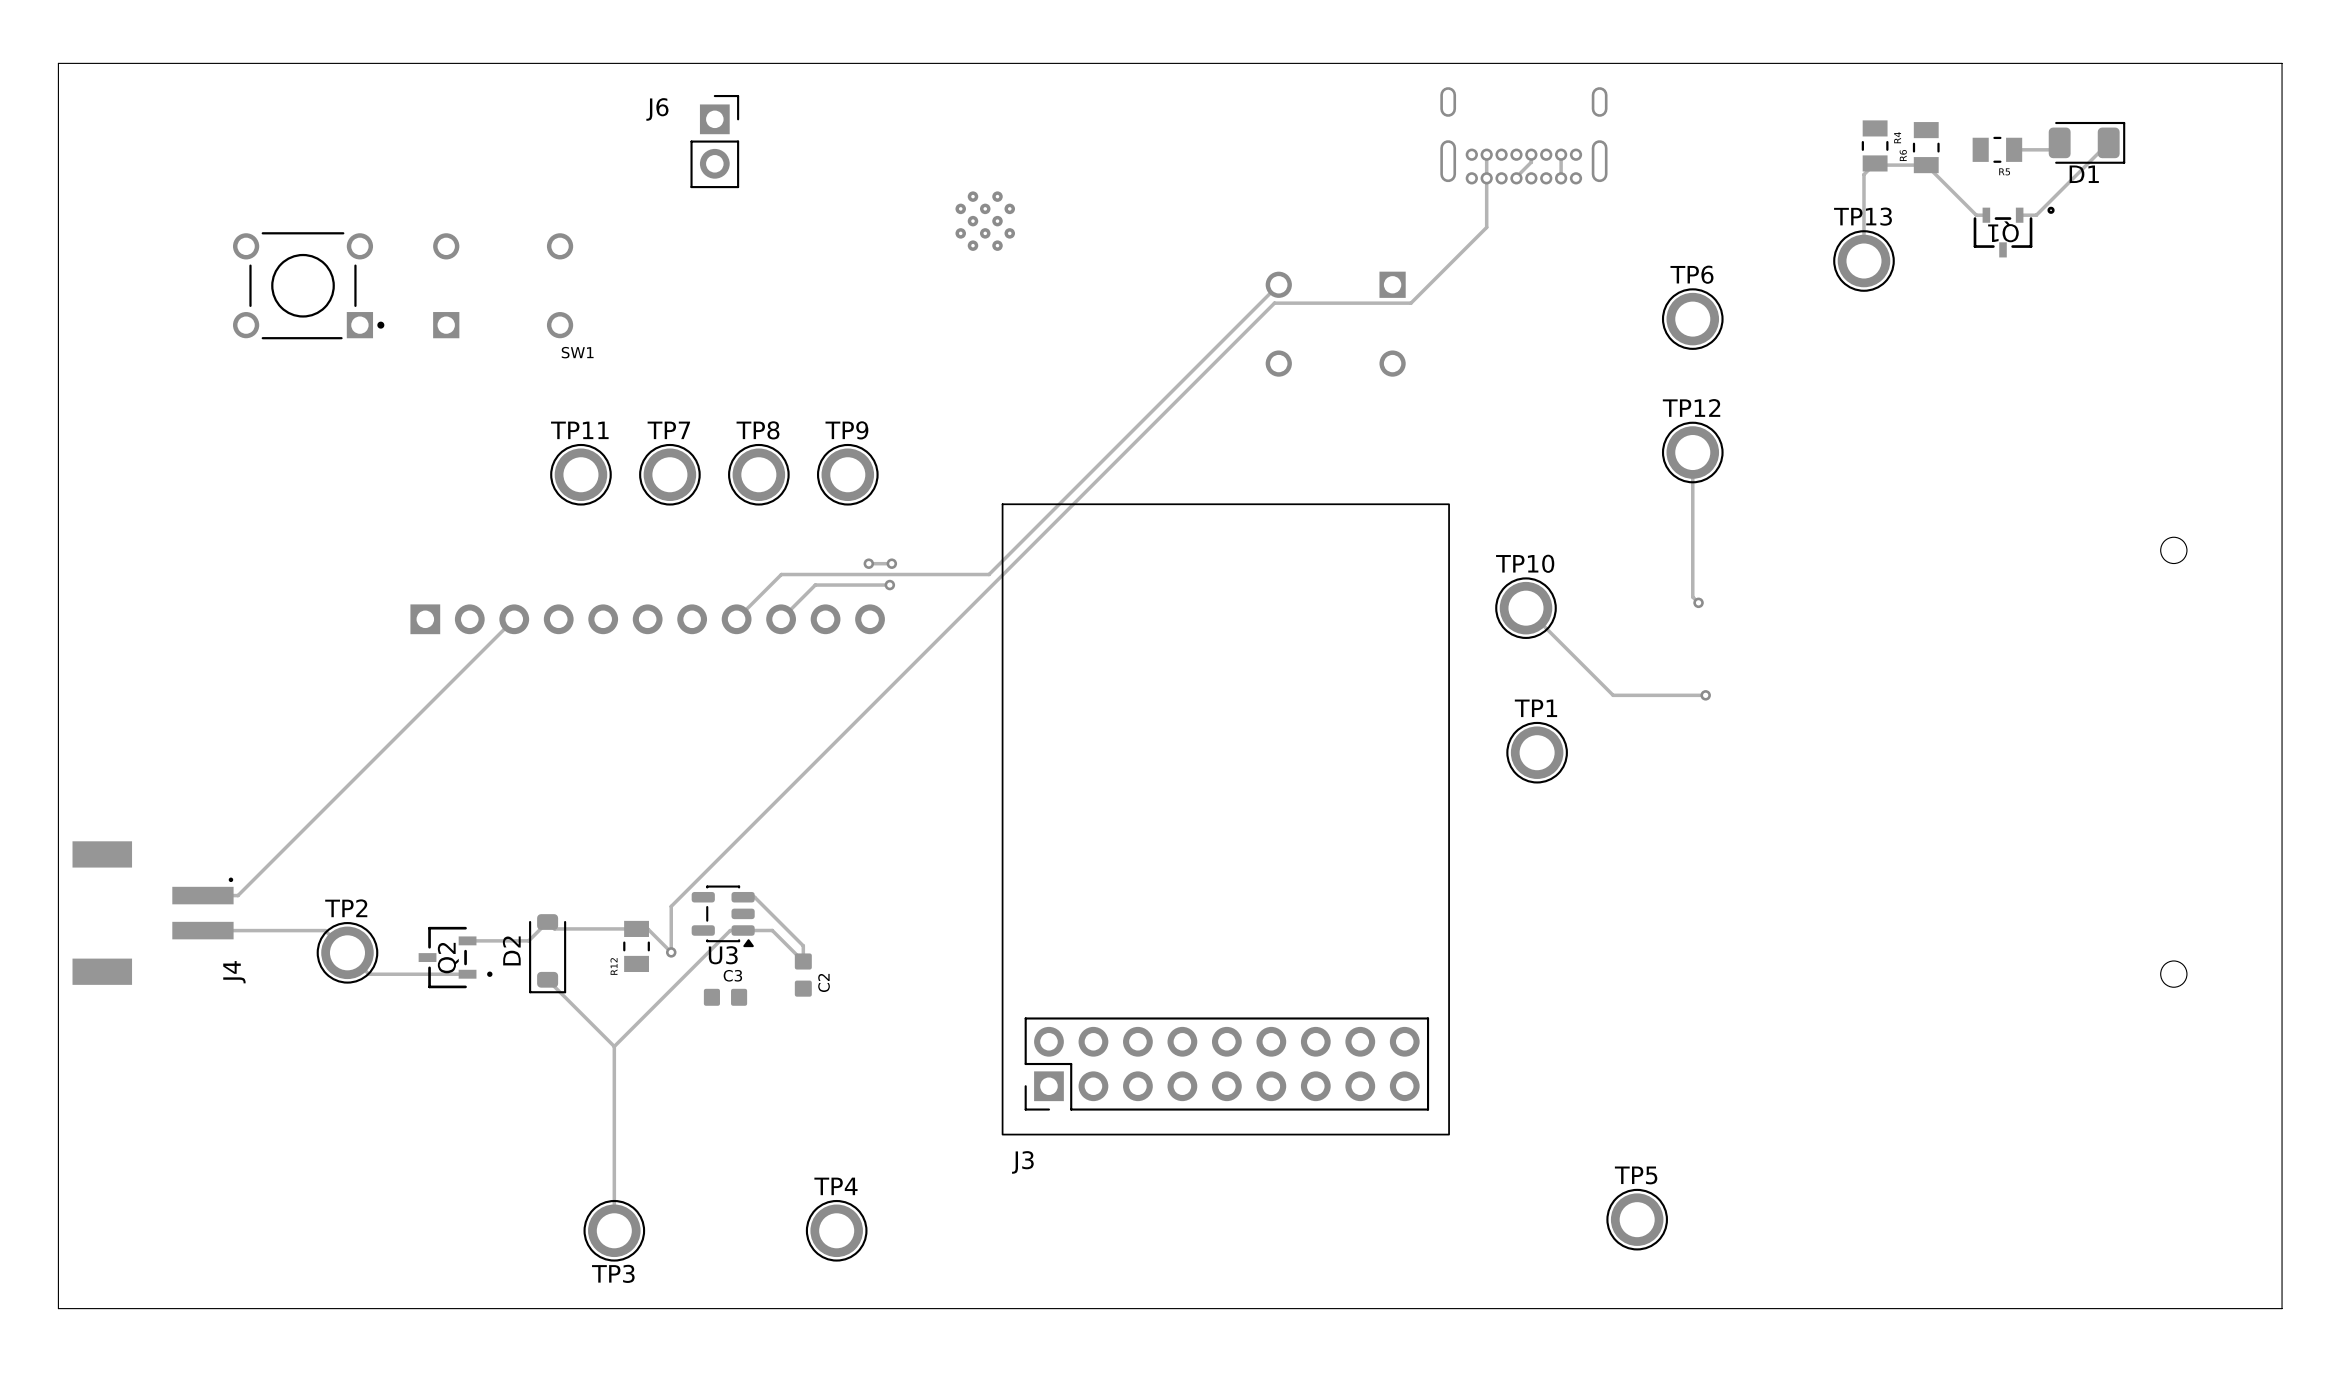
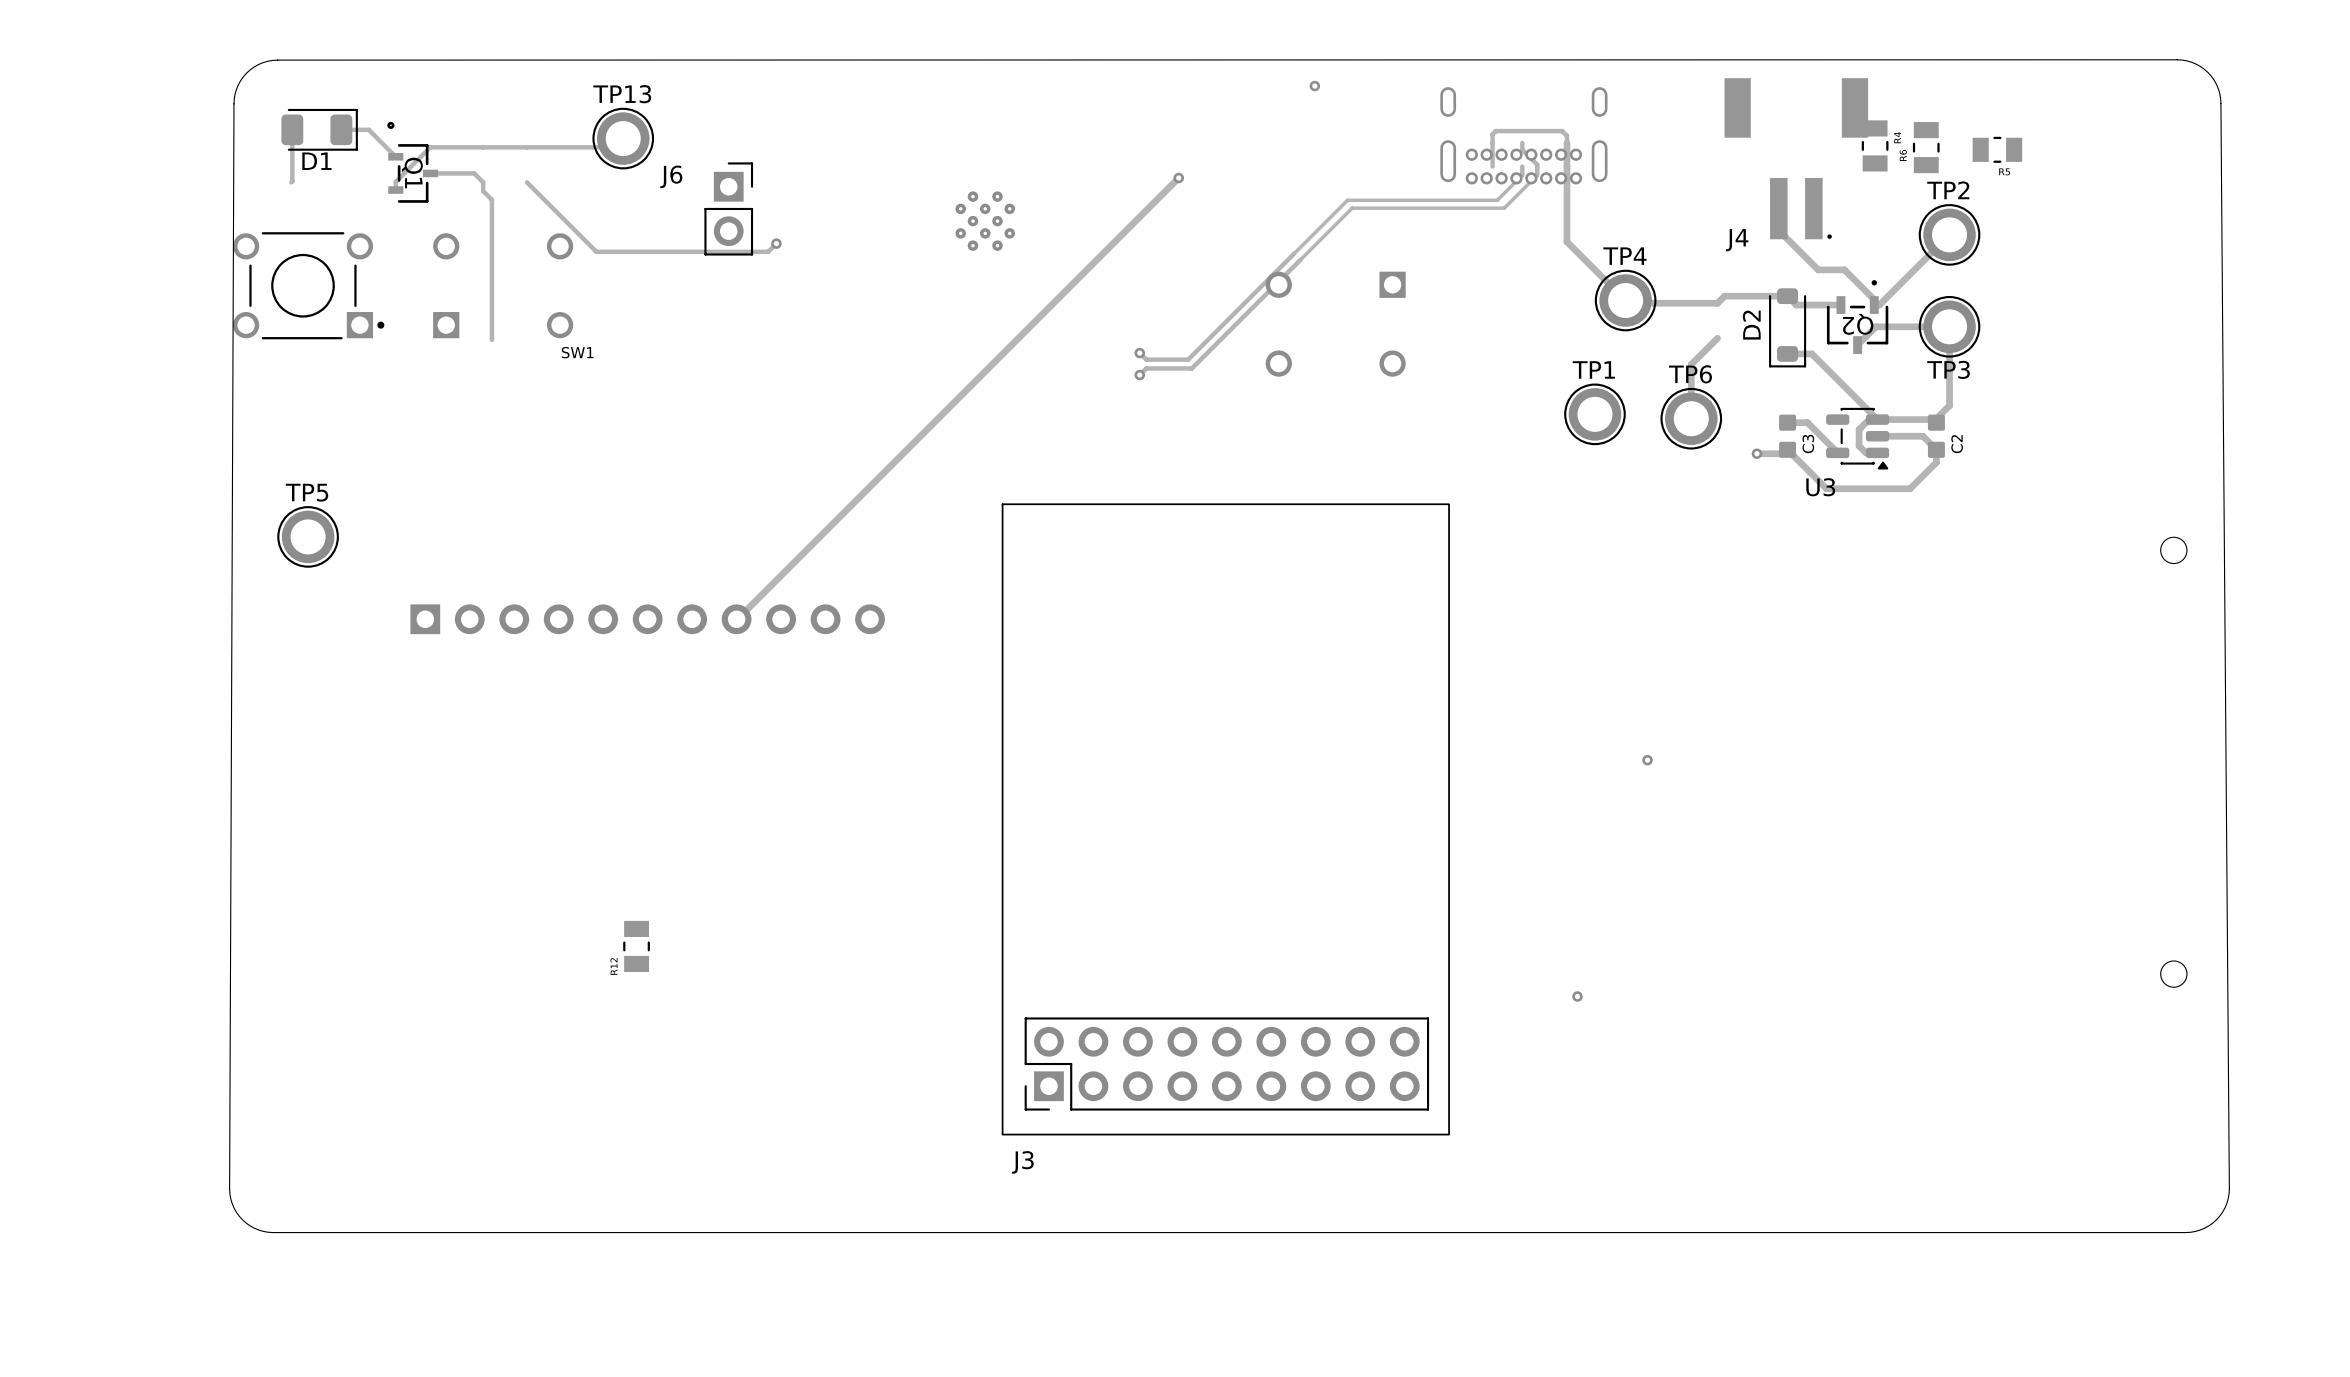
board edge: (58, 63) (2282, 63) (2282, 1308) (58, 1308) (58, 63) -> (2177, 59) (277, 60) (268, 61) (254, 66) (240, 80) (236, 89) (233, 103) (229, 1188) (232, 1203) (236, 1212) (242, 1219) (254, 1228) (273, 1232) (2185, 1232) (2195, 1231) (2208, 1225) (2222, 1212) (2226, 1203) (2229, 1188) (2220, 103) (2216, 84) (2208, 72) (2196, 64) (2177, 59)
via: none -> (1314, 86)
track: none -> (292, 129) (291, 182)
track: none -> (341, 129) (368, 129) (395, 156)
track: none -> (623, 138) (614, 147) (430, 147) (395, 181) (395, 190)
J6 position: (714, 141) -> (728, 208)
track: none -> (1522, 142) (1522, 149) (1537, 164) (1537, 175) (1504, 208) (1352, 208) (1191, 368) (1146, 368) (1139, 375)
track: (2059, 142) (2052, 149) (2014, 149) -> none
D1 position: (2086, 142) -> (319, 129)
track: (2108, 142) (2036, 215) (2019, 215) -> none
track: (1486, 154) (1486, 227) (1410, 303) (1274, 303) (671, 906) (671, 952) (647, 928) (554, 928) (547, 922) (528, 940) (467, 940) -> none
track: (1531, 154) (1531, 162) (1516, 178) -> none
track: (1561, 154) (1561, 178) -> none
track: none -> (1492, 166) (1492, 134) (1495, 131) (1562, 131) (1566, 135) (1566, 241) (1628, 303) (1717, 303) (1724, 296) (1787, 296) (1796, 305) (1840, 305)
track: none -> (1522, 166) (1522, 175) (1497, 200) (1347, 200) (1188, 359) (1146, 359) (1139, 353)
track: none -> (430, 173) (474, 173) (483, 182) (483, 191) (491, 199) (491, 339)
via: none -> (1178, 177)
track: none -> (526, 182) (596, 251) (768, 251) (776, 243)
track: none -> (1778, 208) (1778, 230) (1818, 269) (1844, 269) (1874, 299) (1874, 305) (1879, 305) (1949, 234)
track: (1986, 215) (1976, 215) (1926, 165) (1876, 165) (1875, 163) (1863, 174) (1863, 261) -> none
Q1 rotation: 0° (2014, 232) -> 90° counterclockwise (412, 162)
Q1 position: (2014, 232) -> (412, 162)
via: none -> (776, 243)
TP13 position: (1863, 261) -> (623, 138)
track: (1278, 284) (989, 574) (781, 574) (736, 619) -> (1178, 177) (736, 619)
TP6 position: (1692, 319) -> (1691, 418)
track: none -> (1717, 338) (1691, 364) (1691, 418)
track: none -> (1857, 345) (1875, 326) (1949, 326) (1949, 405) (1936, 418) (1936, 422) (1933, 419) (1869, 419) (1859, 429) (1859, 446) (1865, 452) (1877, 452)
via: none -> (1139, 353)
track: none -> (1787, 353) (1811, 353) (1877, 419)
via: none -> (1139, 375)
track: none -> (1787, 422) (1807, 422) (1837, 452)
track: none -> (1877, 436) (1922, 436) (1936, 449) (1936, 462) (1910, 488) (1826, 488) (1787, 449) (1783, 453) (1756, 453)
track: (1692, 452) (1692, 597) (1698, 602) -> none
TP12: (1692, 452) -> none
via: none -> (1756, 453)
TP11: (580, 474) -> none
TP7: (669, 474) -> none
TP8: (758, 474) -> none
TP9: (847, 474) -> none
track: (868, 563) (891, 563) -> none
via: (868, 563) -> none
via: (891, 563) -> none
track: (889, 585) (815, 585) (781, 619) -> none
via: (889, 585) -> none
via: (1698, 602) -> none
track: (1526, 608) (1613, 695) (1705, 695) -> none
TP10: (1526, 608) -> none
track: (514, 619) (237, 895) (202, 895) -> none
via: (1705, 695) -> none
TP1 position: (1537, 752) -> (1594, 414)
via: none -> (1647, 760)
track: (743, 897) (754, 897) (803, 945) (803, 961) (772, 930) (730, 930) (614, 1046) -> none
J4 rotation: 0° (153, 913) -> 90° clockwise (1796, 158)
J4 position: (153, 913) -> (1796, 158)
U3 position: (723, 916) -> (1857, 438)
track: (202, 930) (325, 930) (368, 974) (467, 974) -> none
TP2 position: (347, 952) -> (1949, 234)
via: (671, 952) -> none
D2 position: (547, 953) -> (1787, 327)
U3 name position: U3 (723, 955) -> U3 (1820, 487)
Q2 rotation: 0° (455, 957) -> 90° counterclockwise (1857, 317)
Q2 position: (455, 957) -> (1857, 317)
C2 position: (803, 975) -> (1936, 436)
track: (547, 979) (614, 1046) -> none
via: none -> (1577, 996)
C3 rotation: 0° (725, 997) -> 90° clockwise (1787, 436)
C3 position: (725, 997) -> (1787, 436)
track: (614, 1046) (614, 1230) -> none
TP5 position: (1637, 1219) -> (308, 536)
TP3 position: (614, 1230) -> (1949, 326)
TP4 position: (836, 1230) -> (1625, 300)

